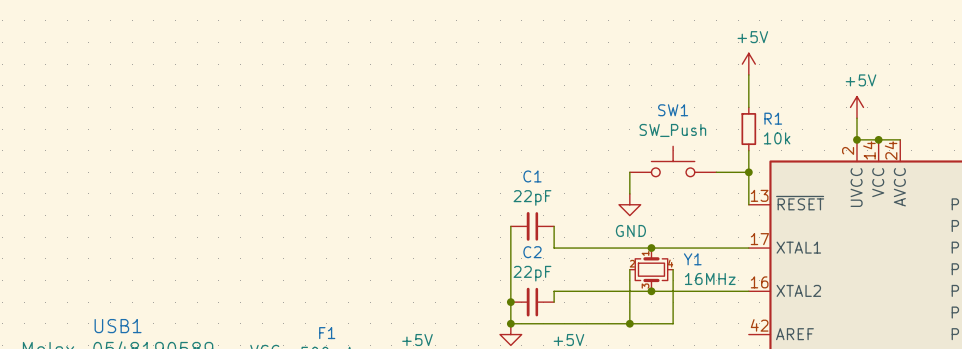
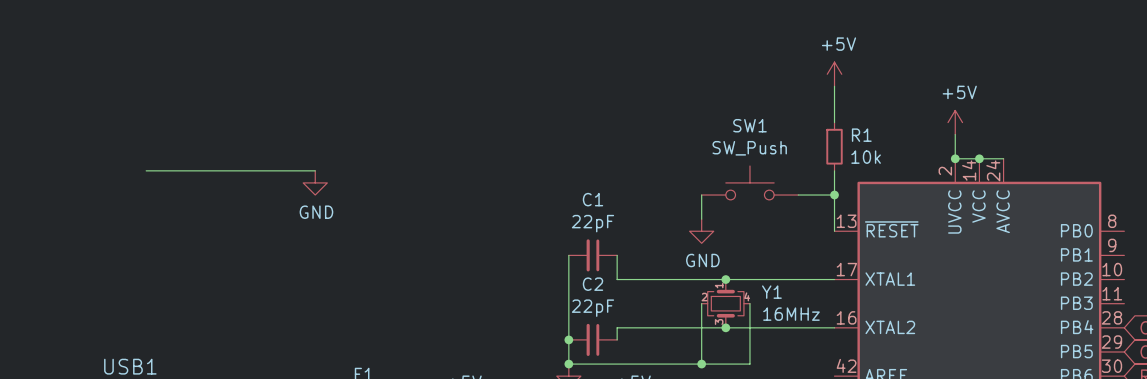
wire: none -> (146, 170) (315, 170)
power symbol: none -> GND (315, 182)

